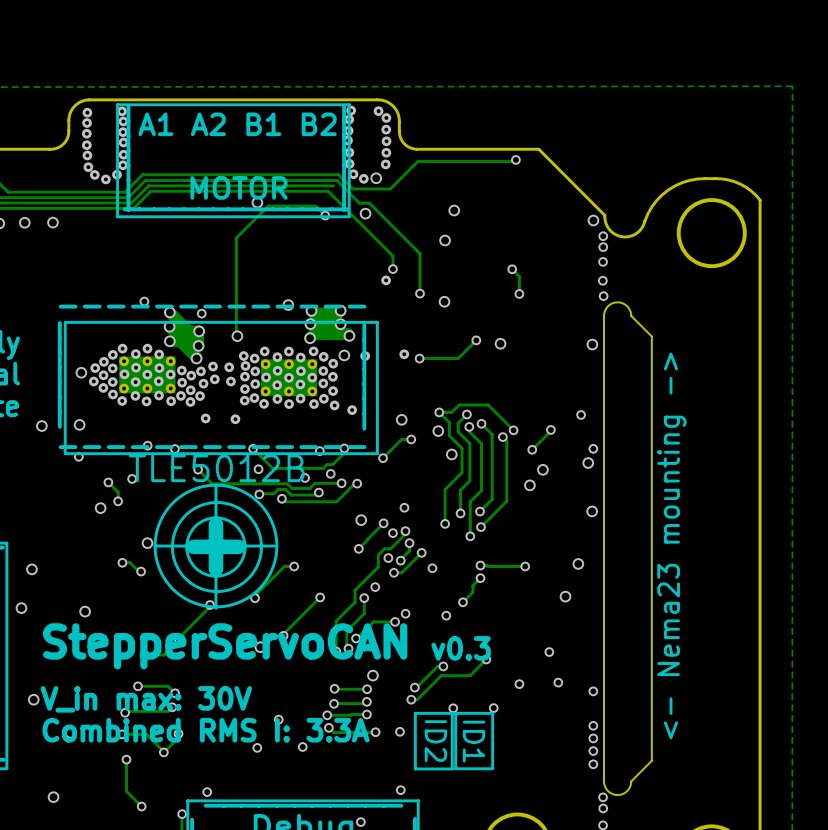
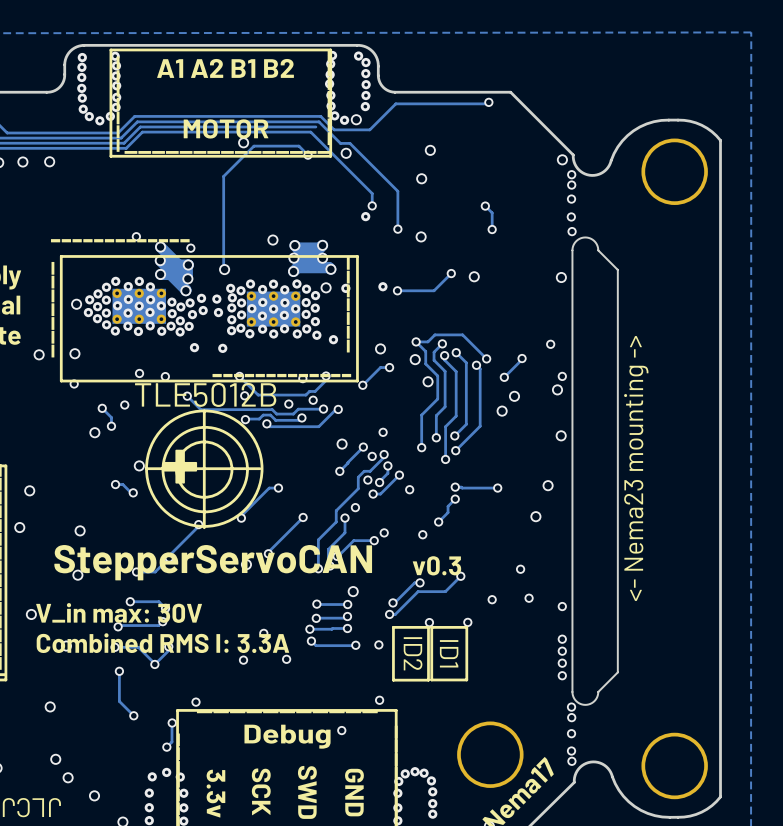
via: none -> (77, 575)

